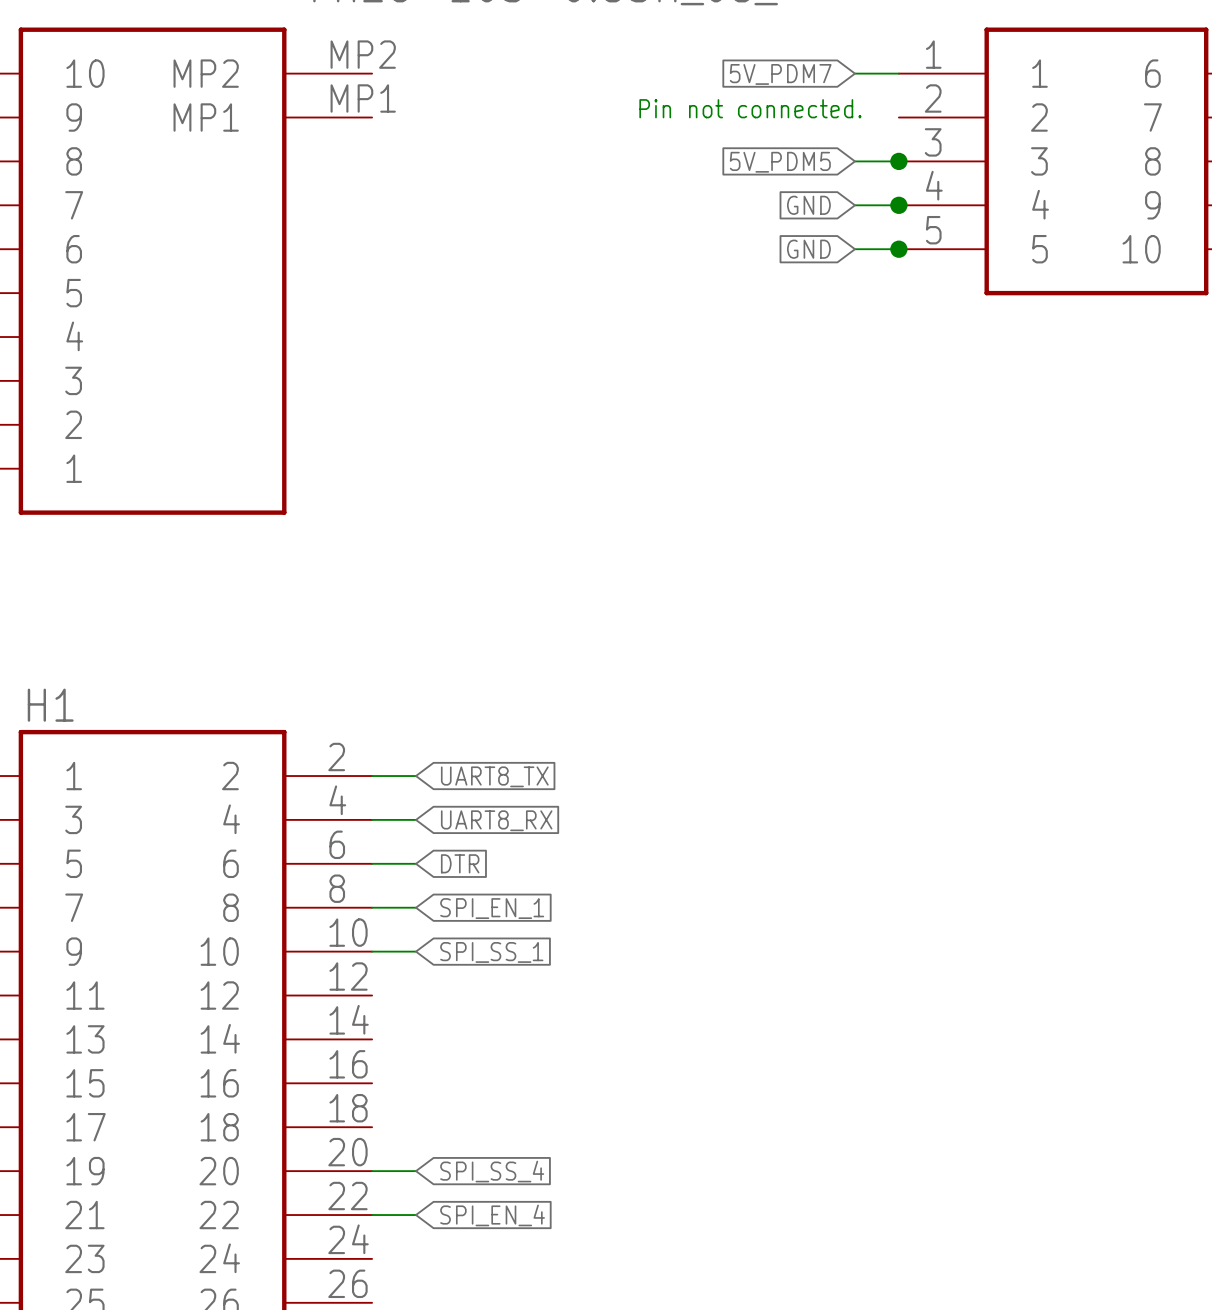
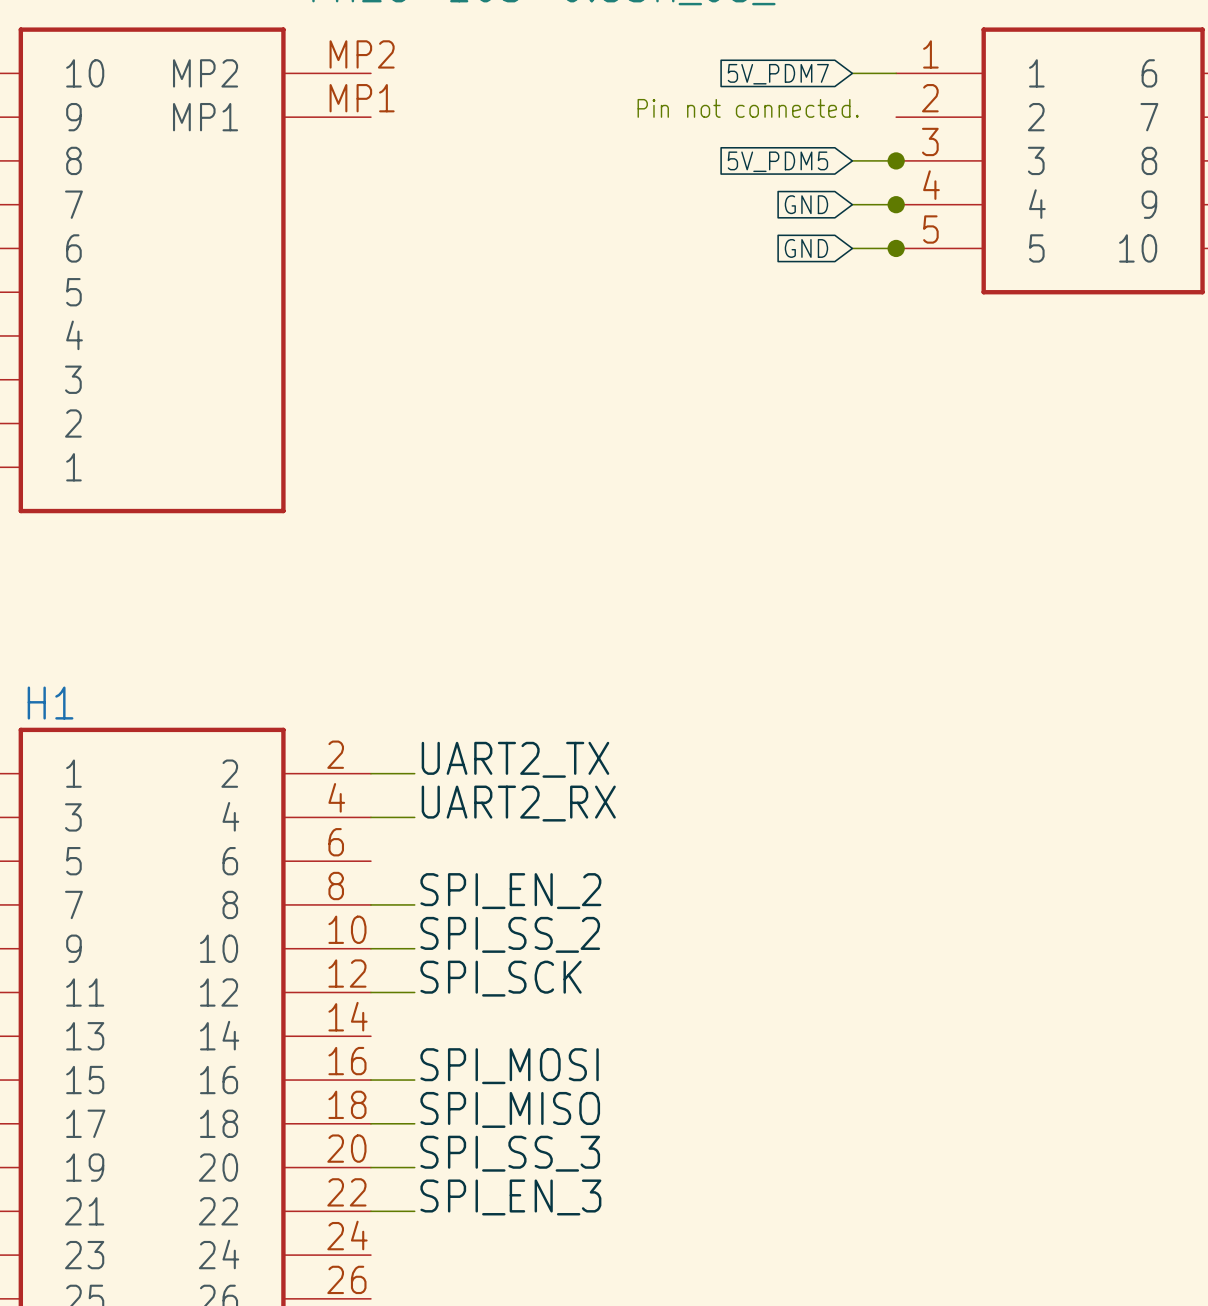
label: none -> UART2_TX (515, 759)
global label: UART8_TX (494, 776) -> none
label: none -> UART2_RX (518, 803)
global label: UART8_RX (496, 820) -> none
wire: (372, 863) (415, 863) -> (370, 992) (414, 992)
global label: DTR (460, 863) -> none
label: none -> SPI_EN_2 (510, 891)
global label: SPI_EN_1 (492, 908) -> none
label: none -> SPI_SS_2 (510, 934)
global label: SPI_SS_1 (491, 952) -> none
label: none -> SPI_SCK (501, 978)
label: none -> SPI_MOSI (509, 1066)
wire: none -> (370, 1080) (414, 1080)
label: none -> SPI_MISO (510, 1109)
wire: none -> (370, 1123) (414, 1123)
label: none -> SPI_SS_3 (510, 1153)
global label: SPI_SS_4 (492, 1171) -> none
label: none -> SPI_EN_3 (510, 1197)
global label: SPI_EN_4 (492, 1215) -> none

